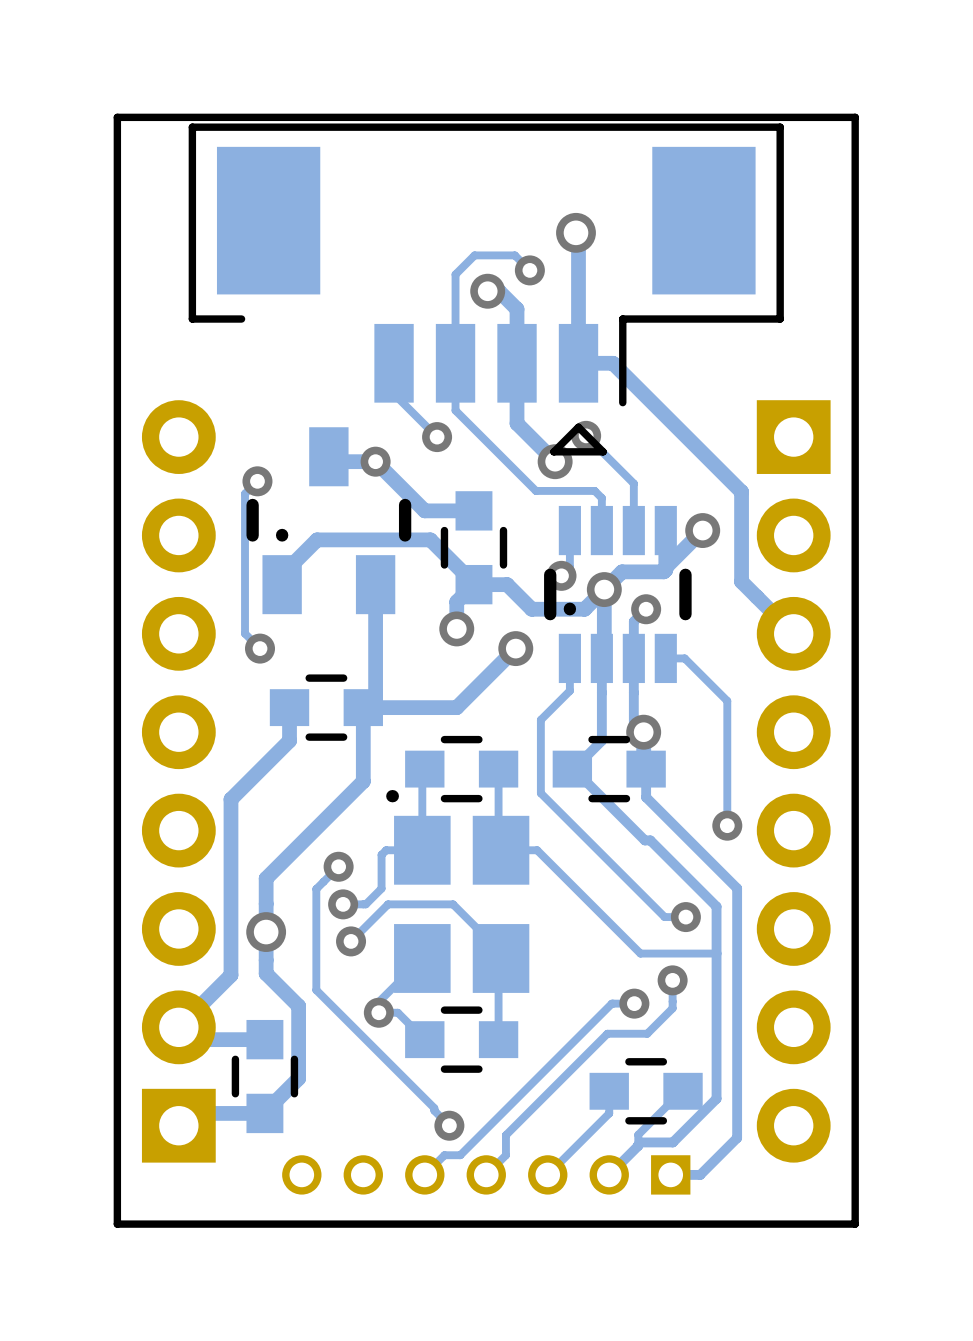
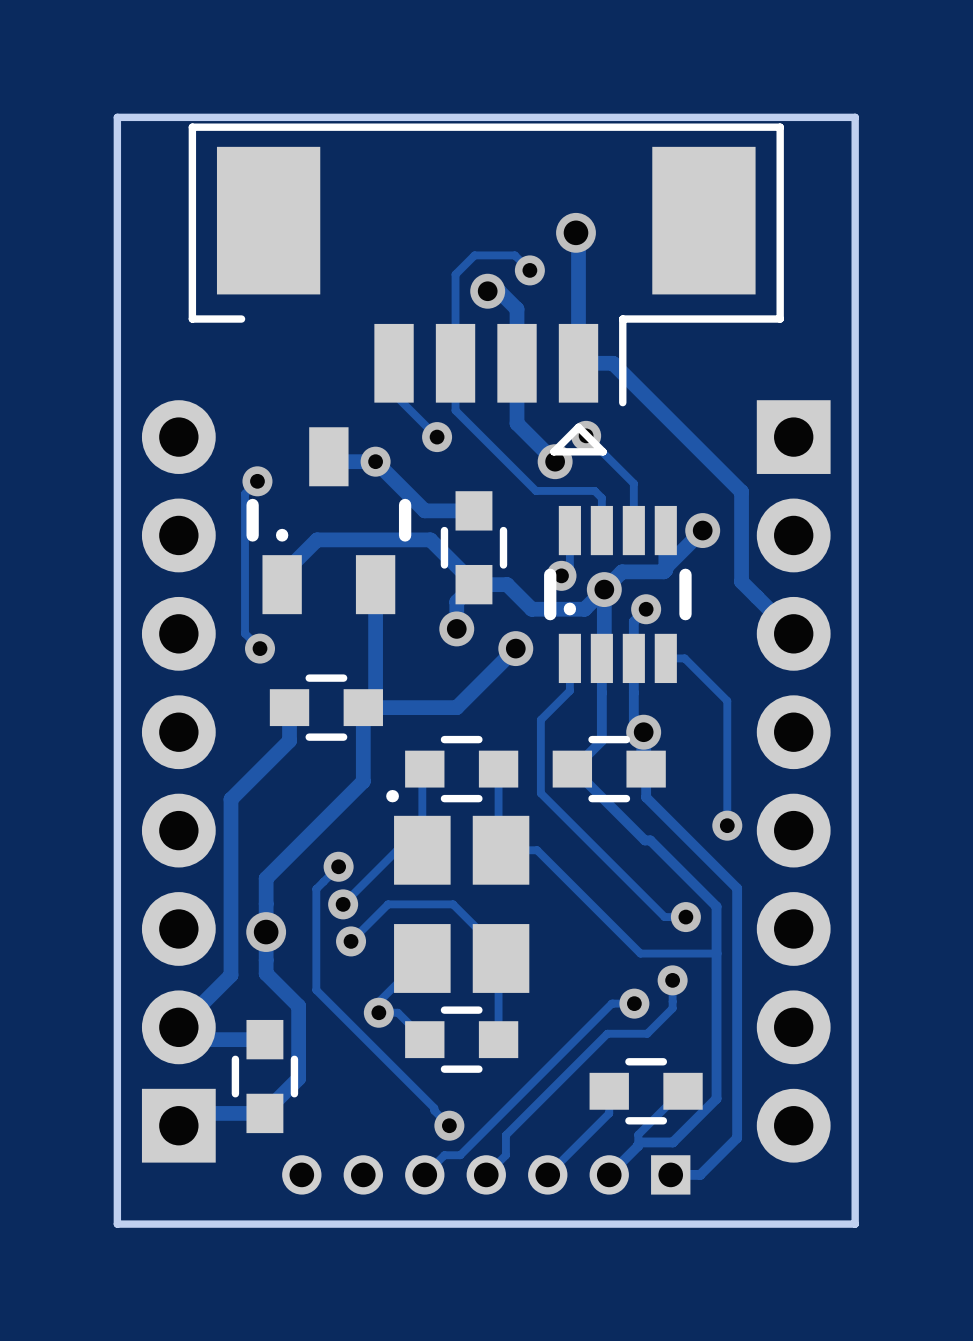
track: (397, 850) (386, 850) (381, 854) (381, 888) (365, 904) (343, 904) -> (397, 850) (343, 904)

